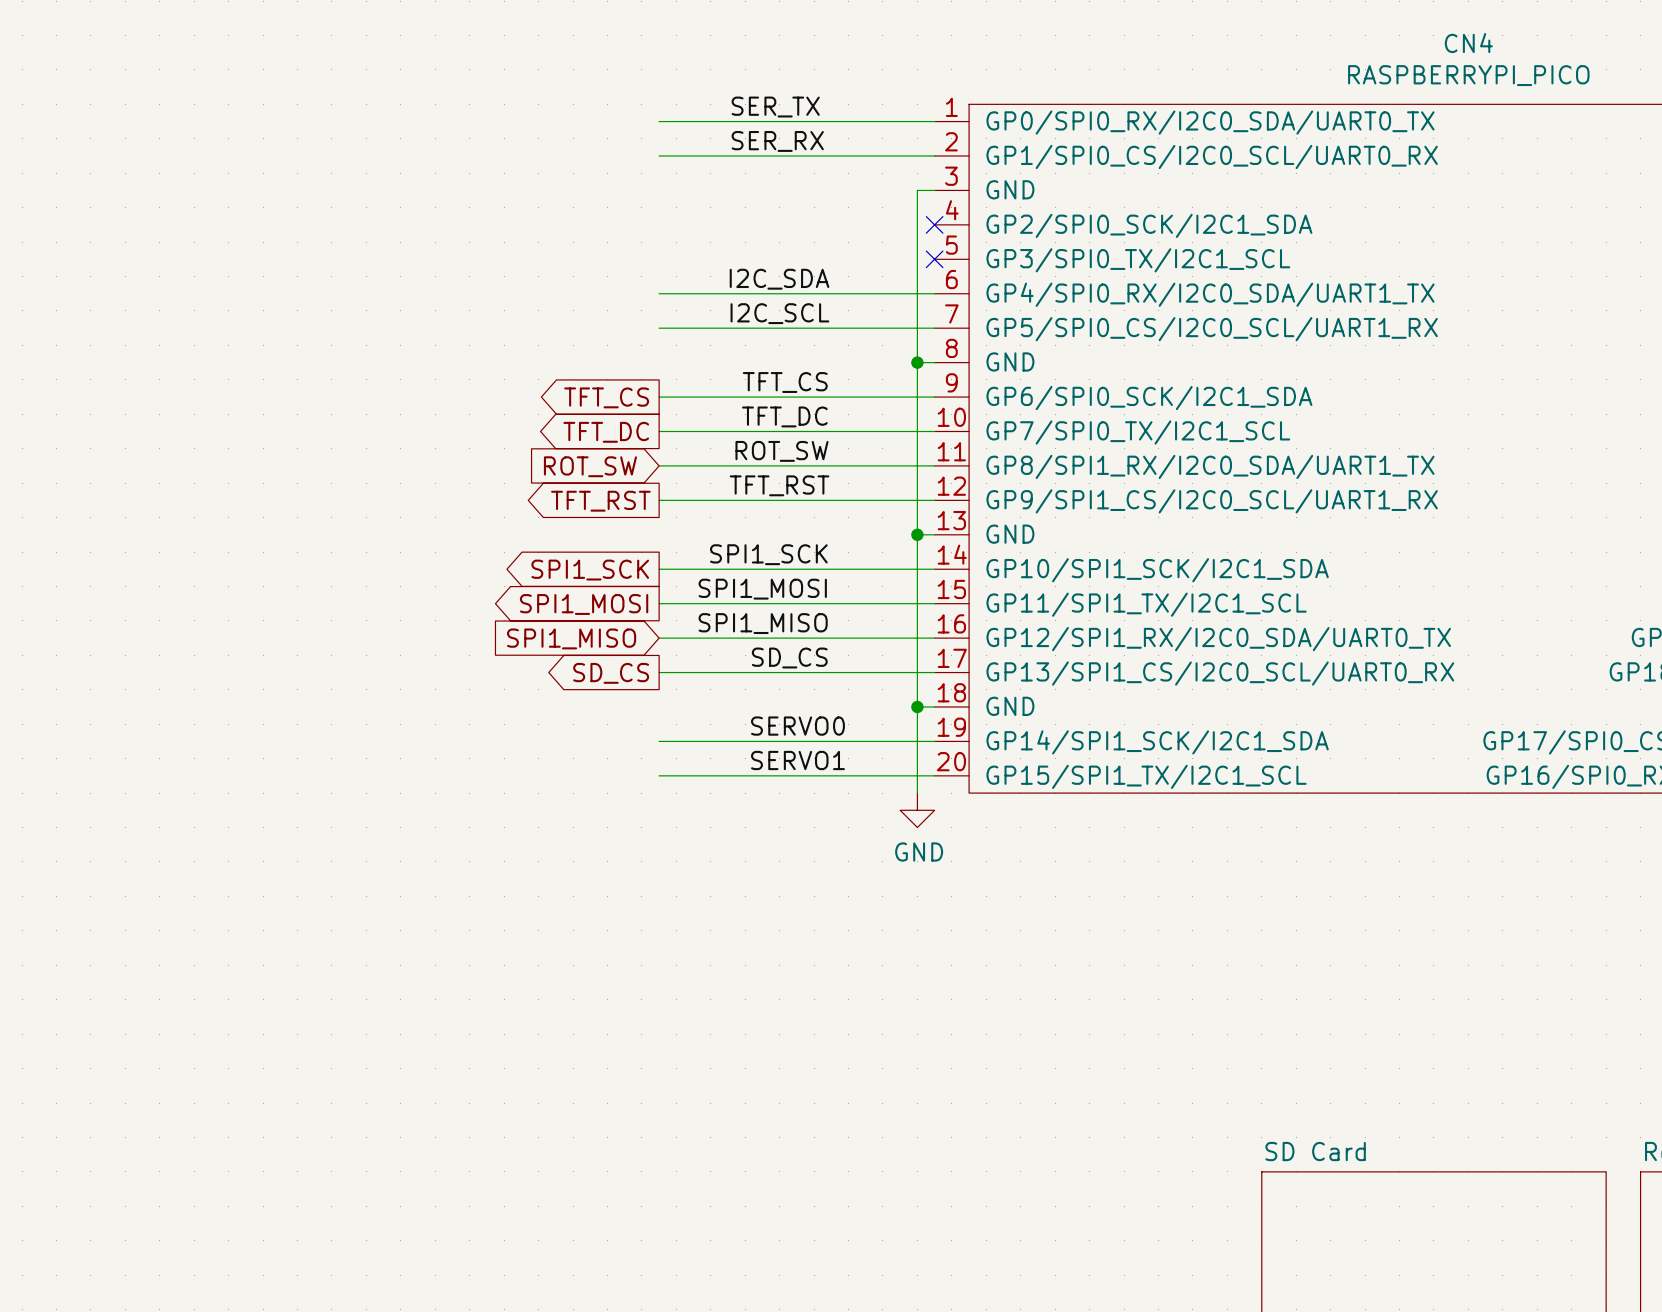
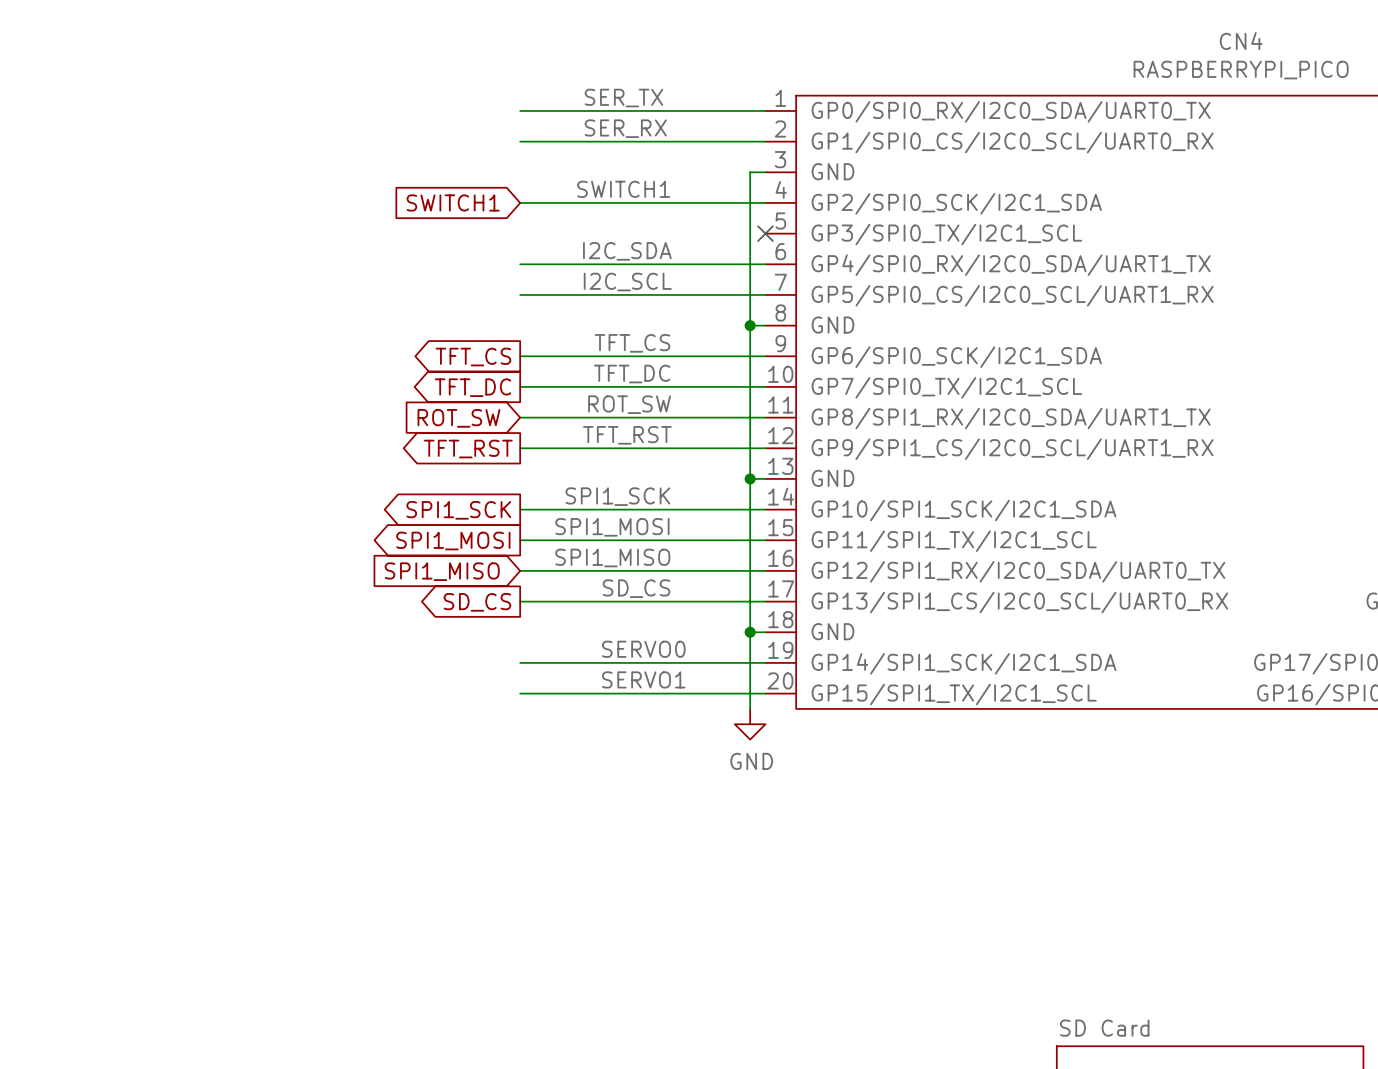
label: none -> SWITCH1 (623, 189)
global label: none -> SWITCH1 (453, 202)
wire: none -> (520, 202) (765, 202)
no-connect mark: (934, 224) -> none

